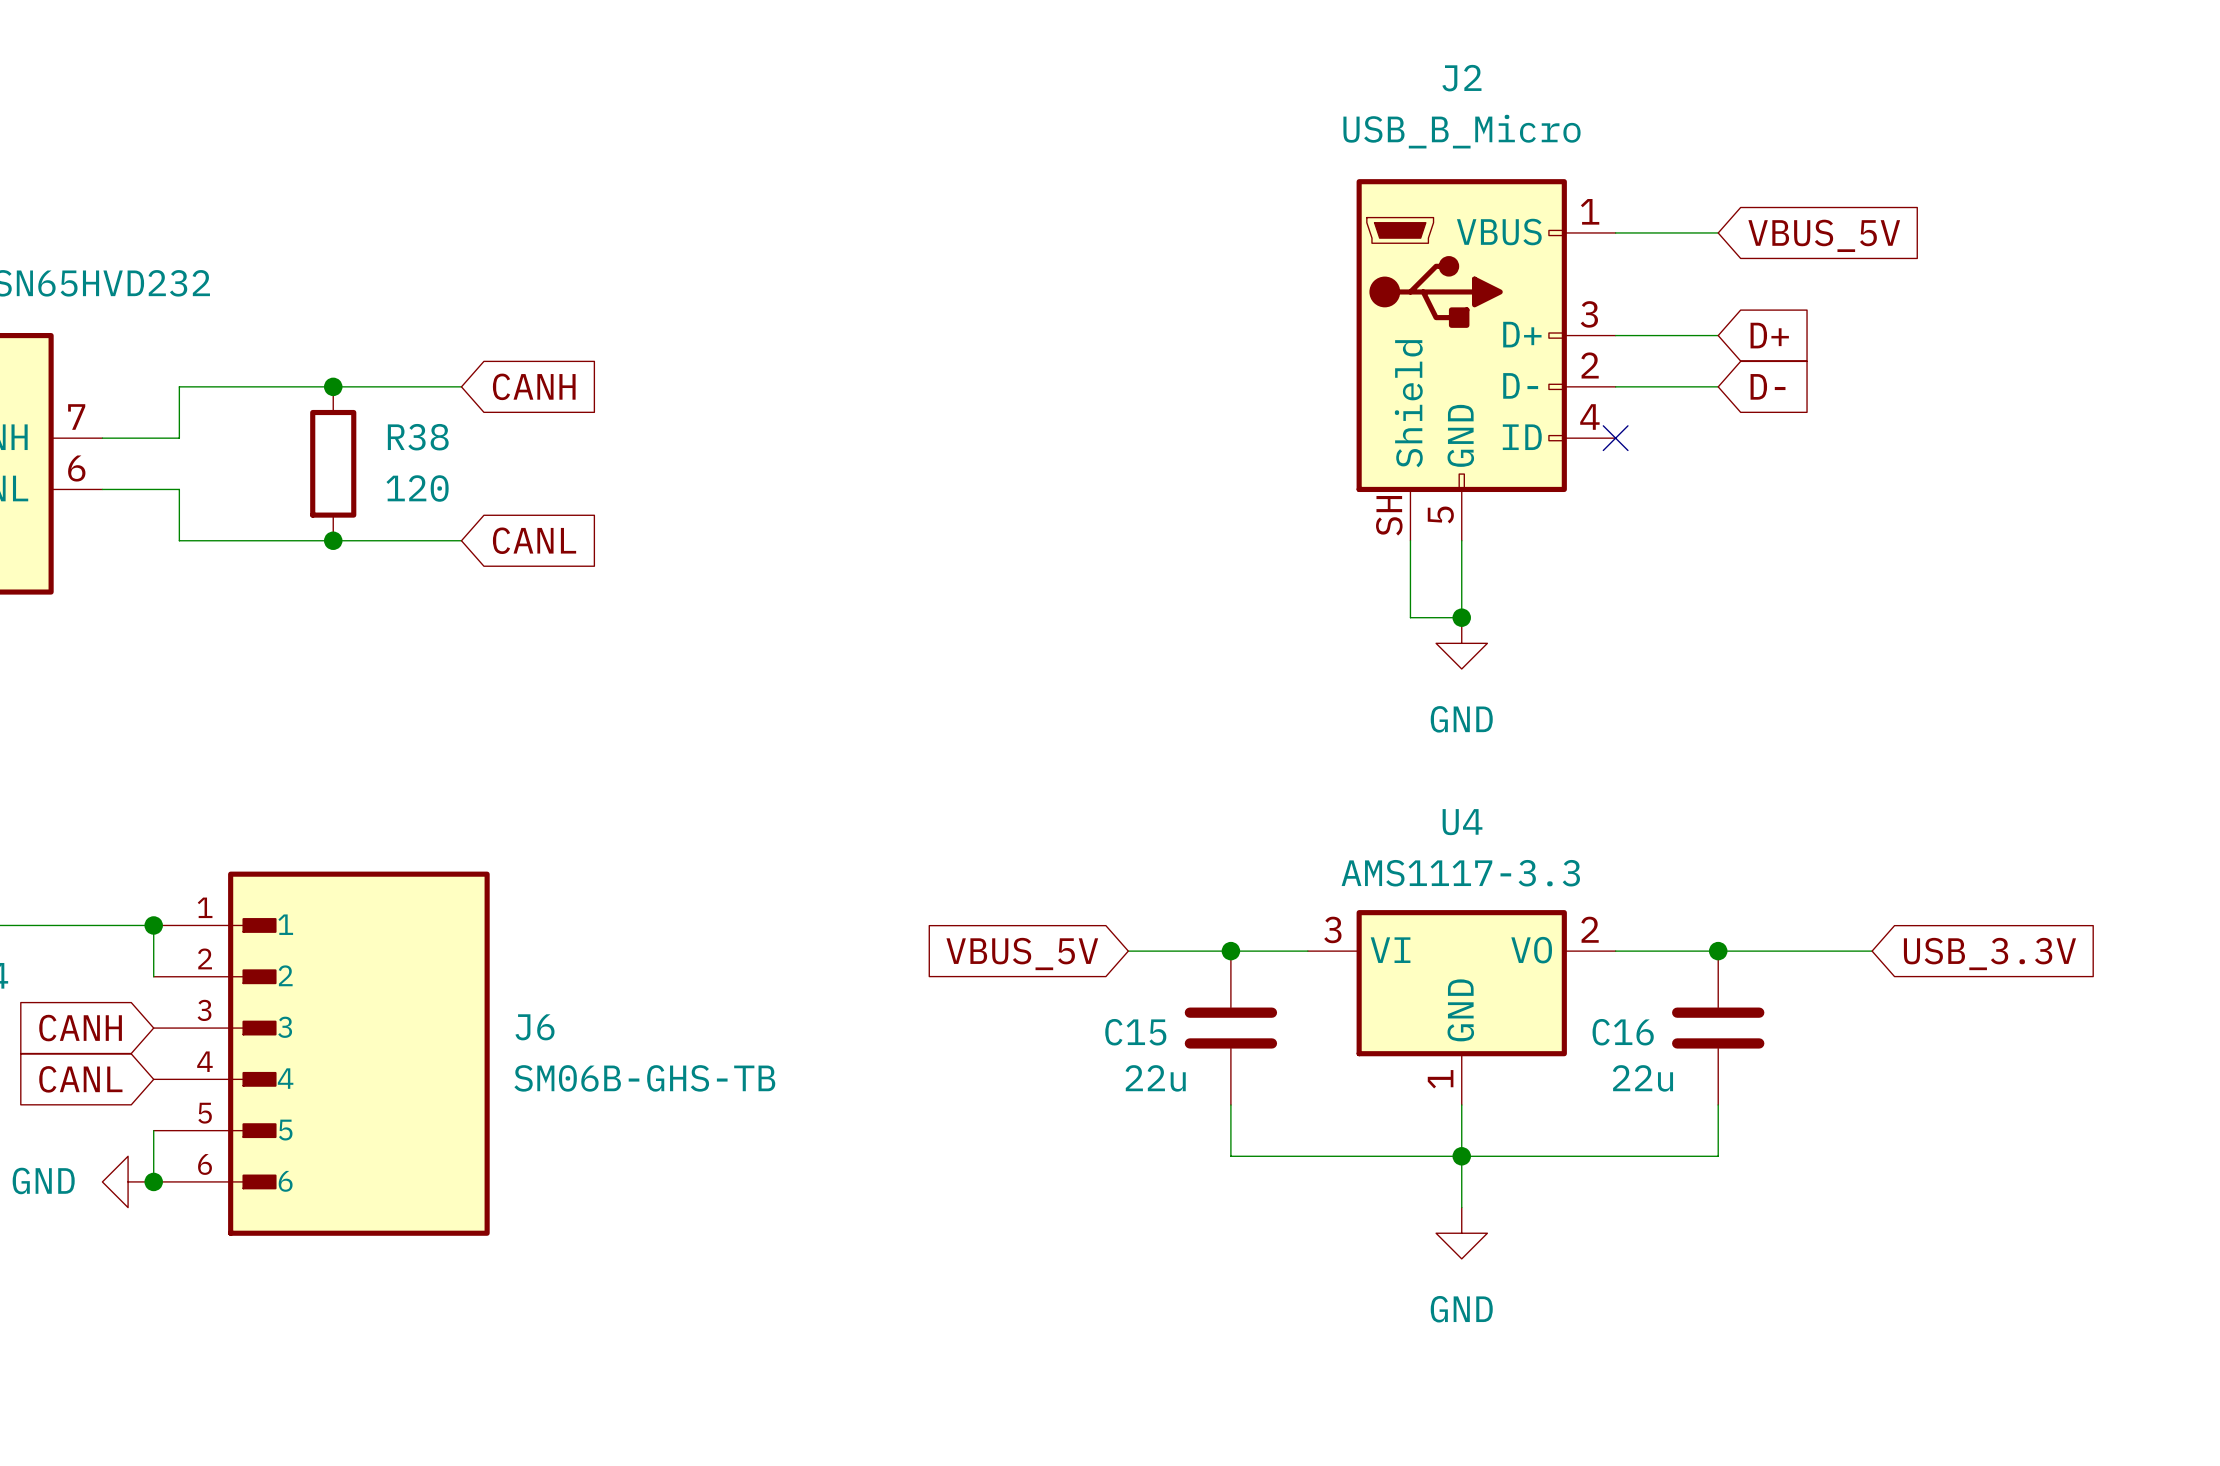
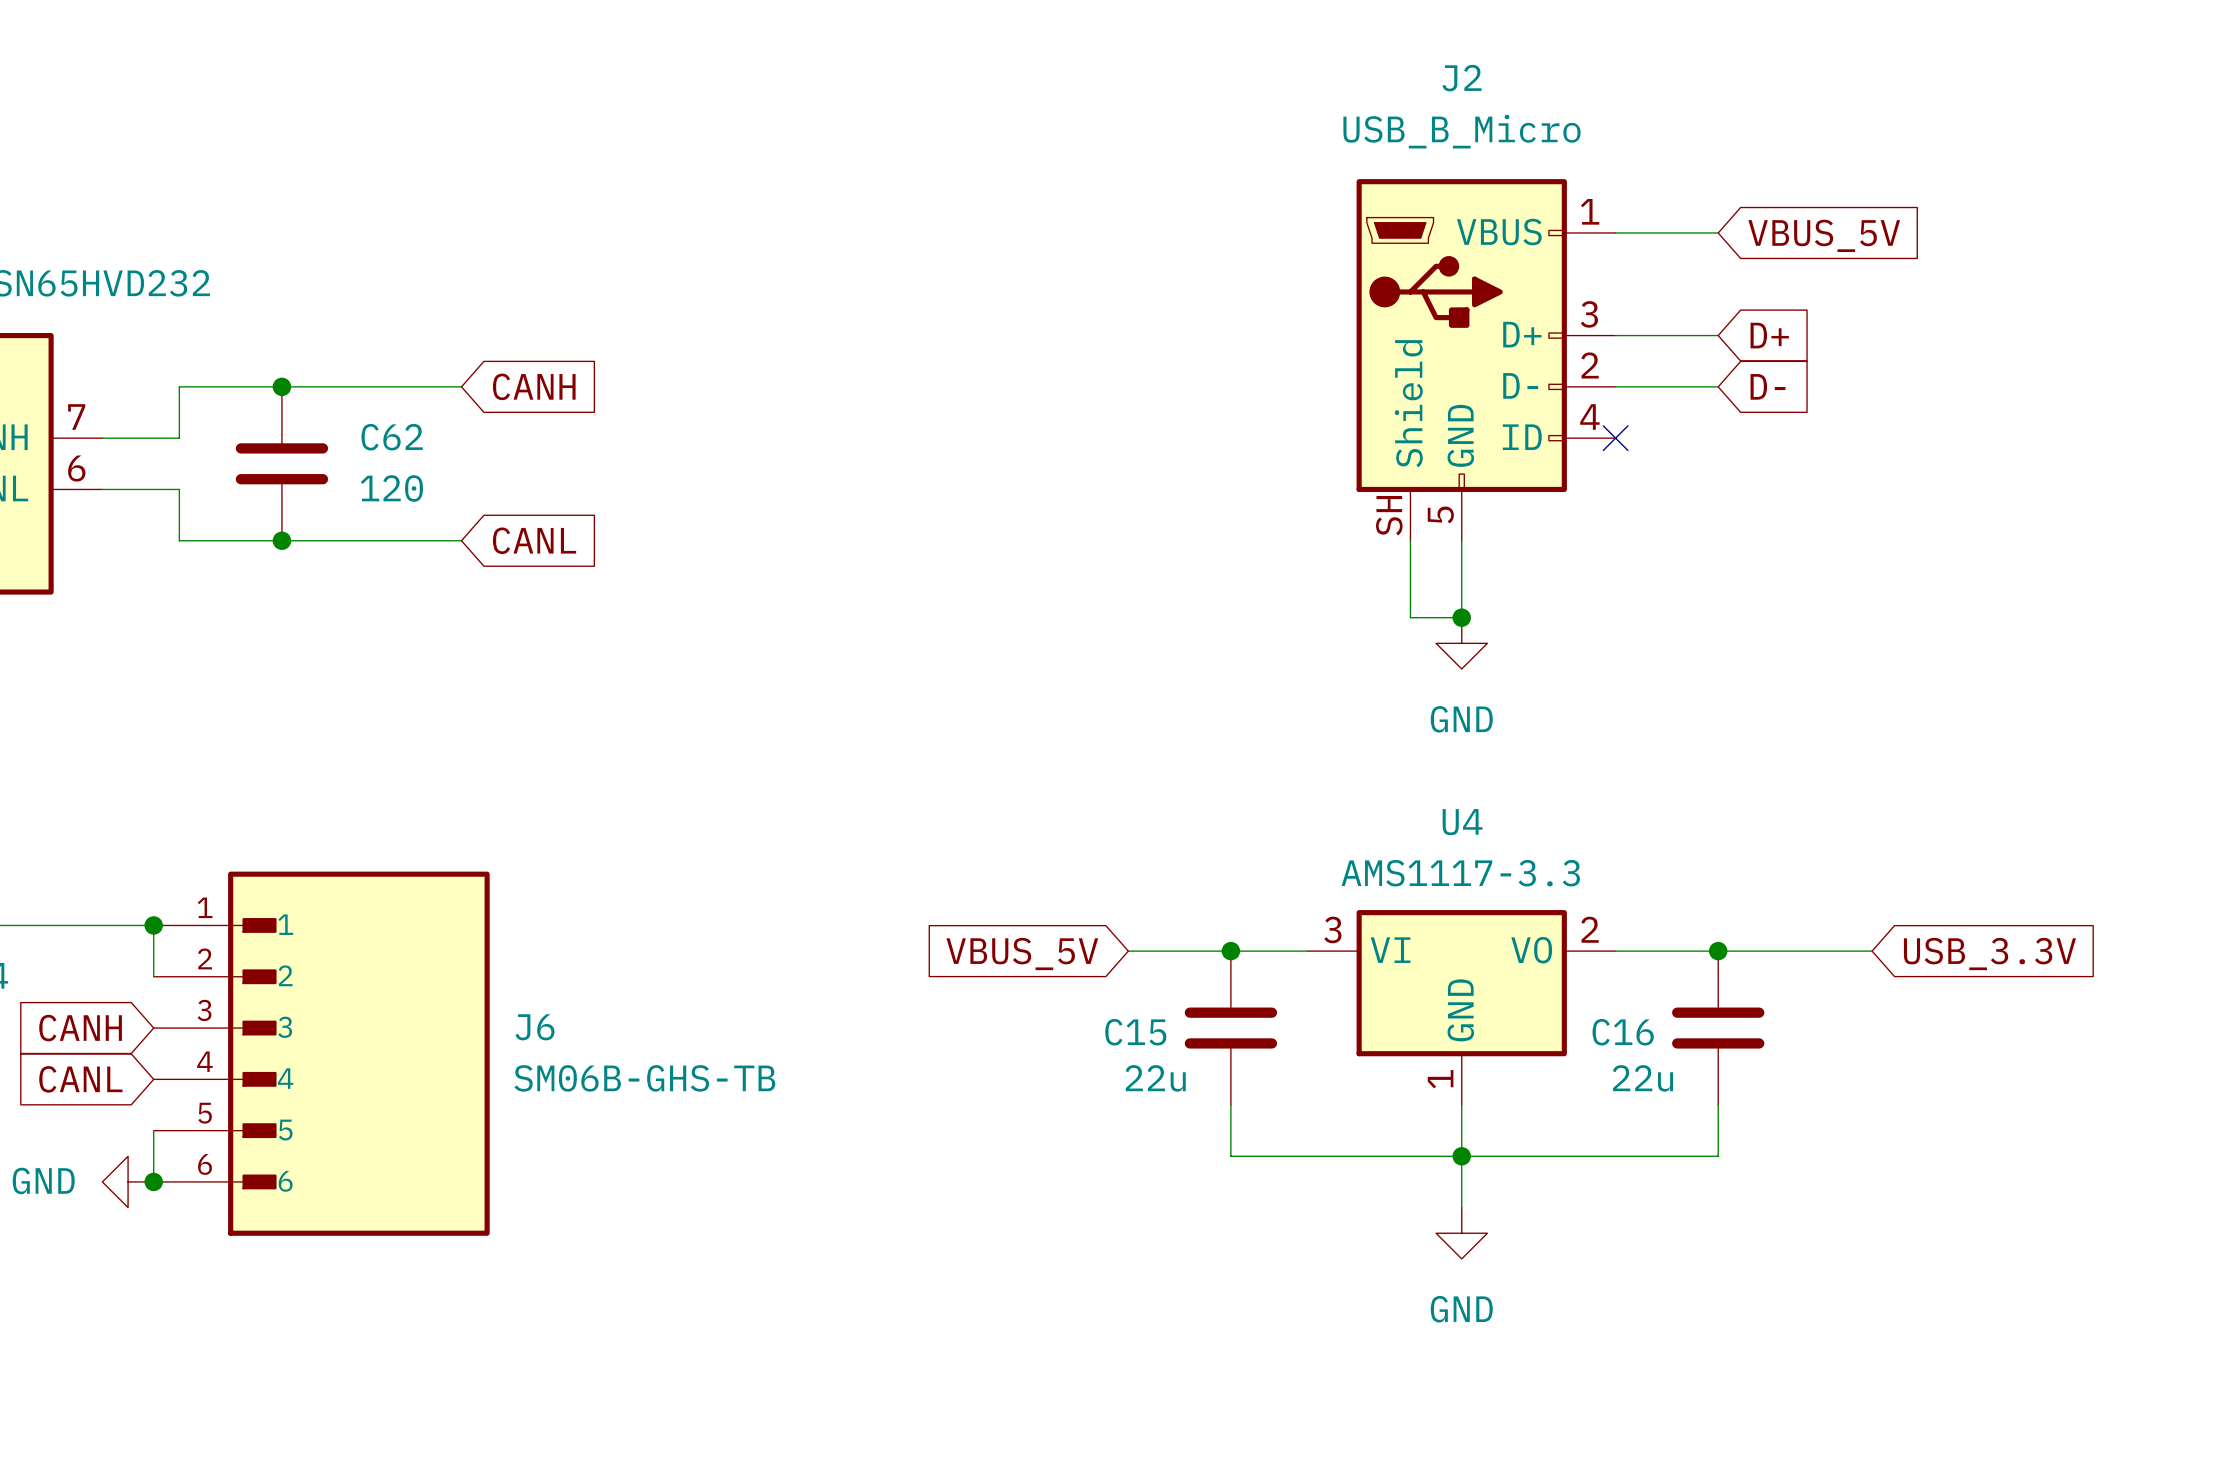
junction position: (333, 386) -> (281, 386)
C62: none -> 120 (281, 463)
R38: 120 (333, 463) -> none
junction position: (333, 540) -> (281, 540)

